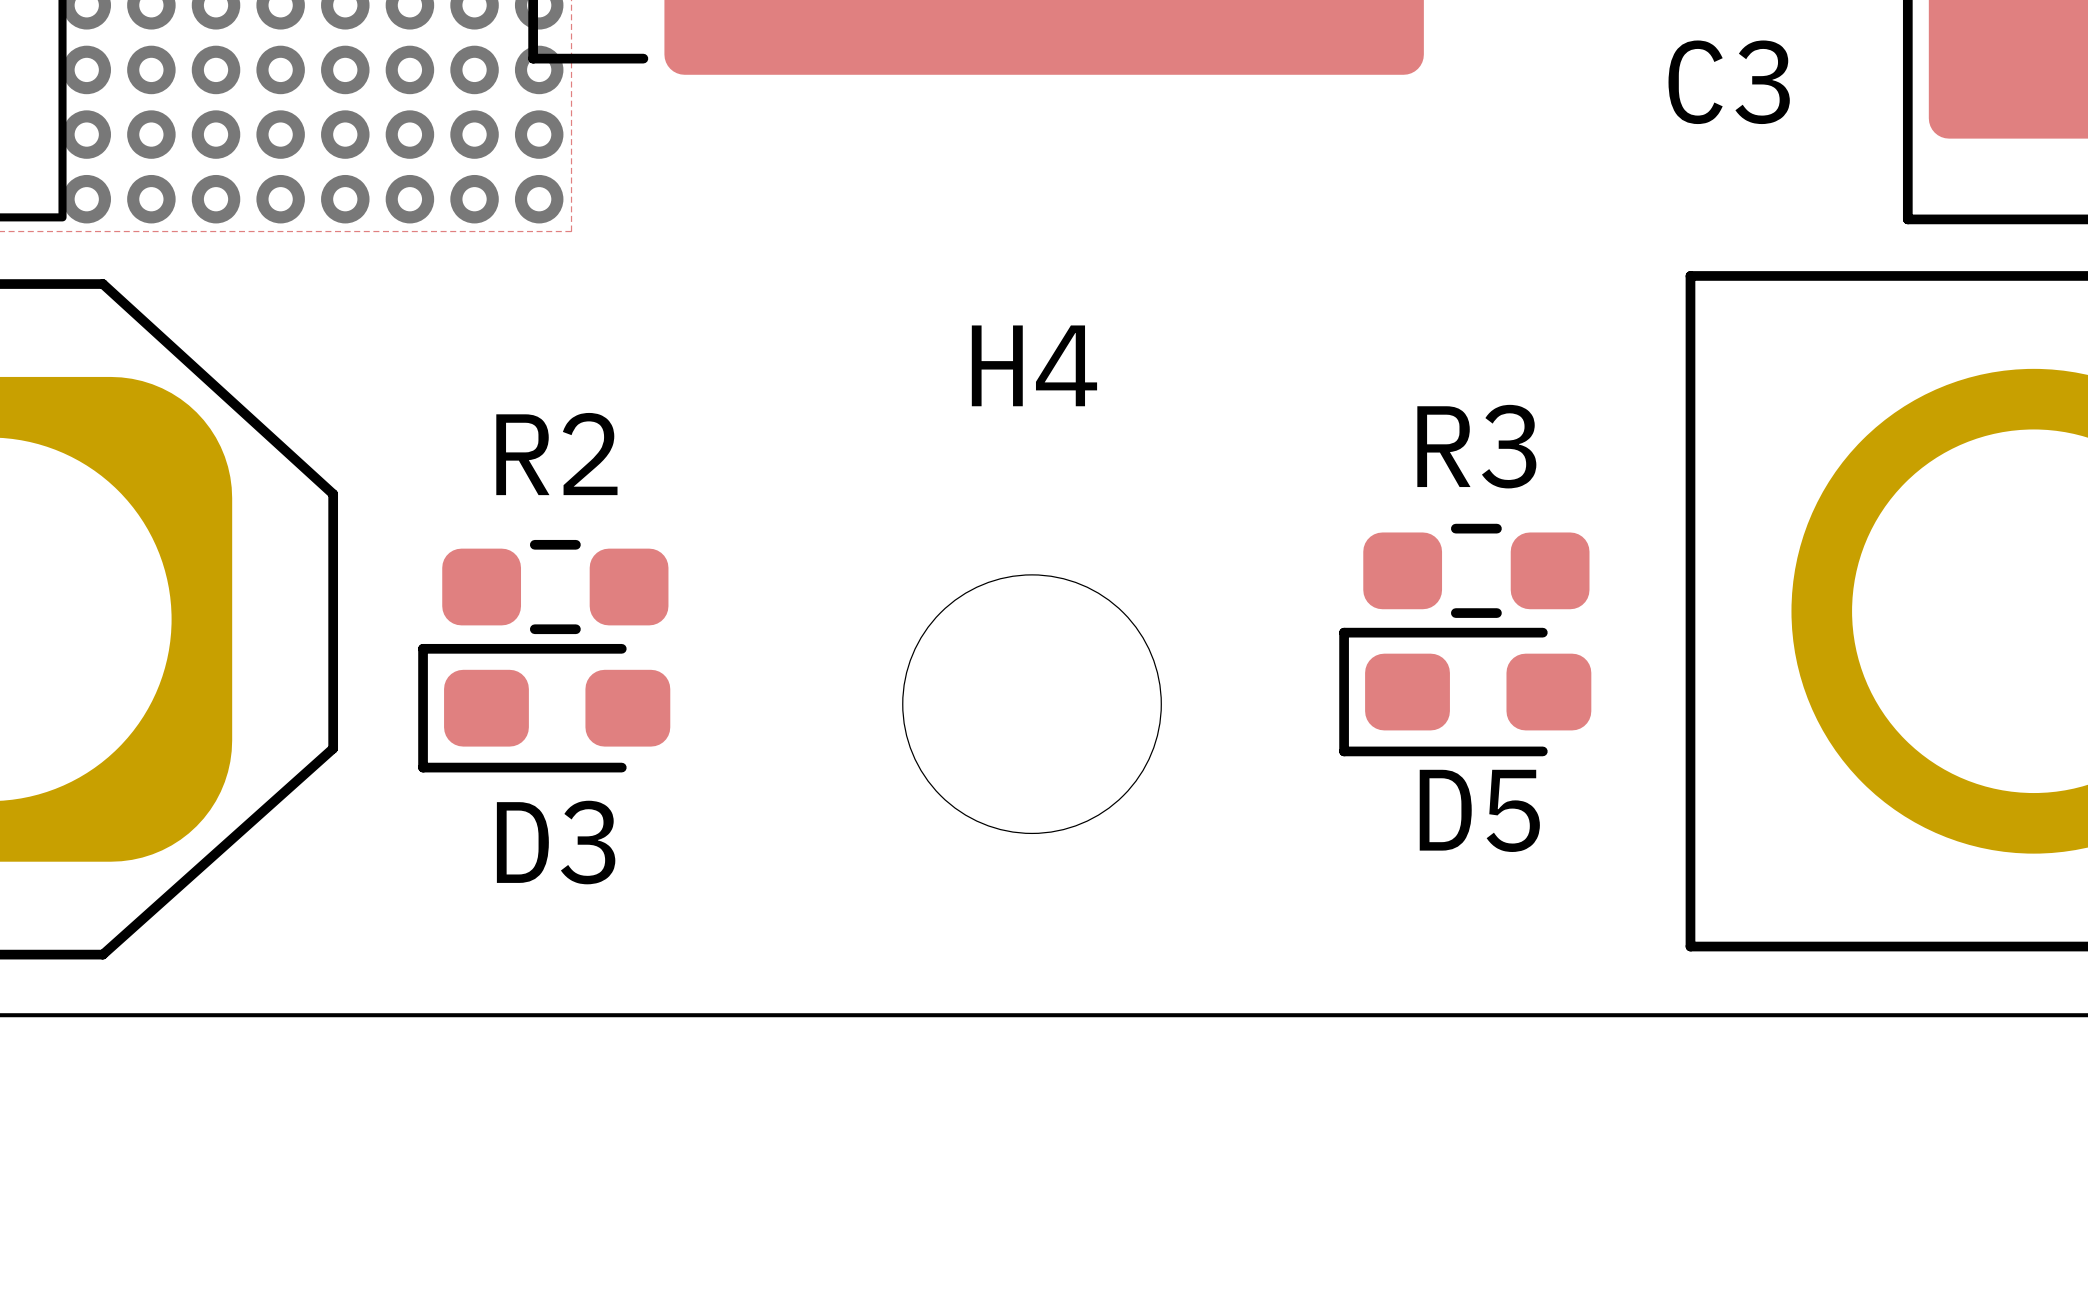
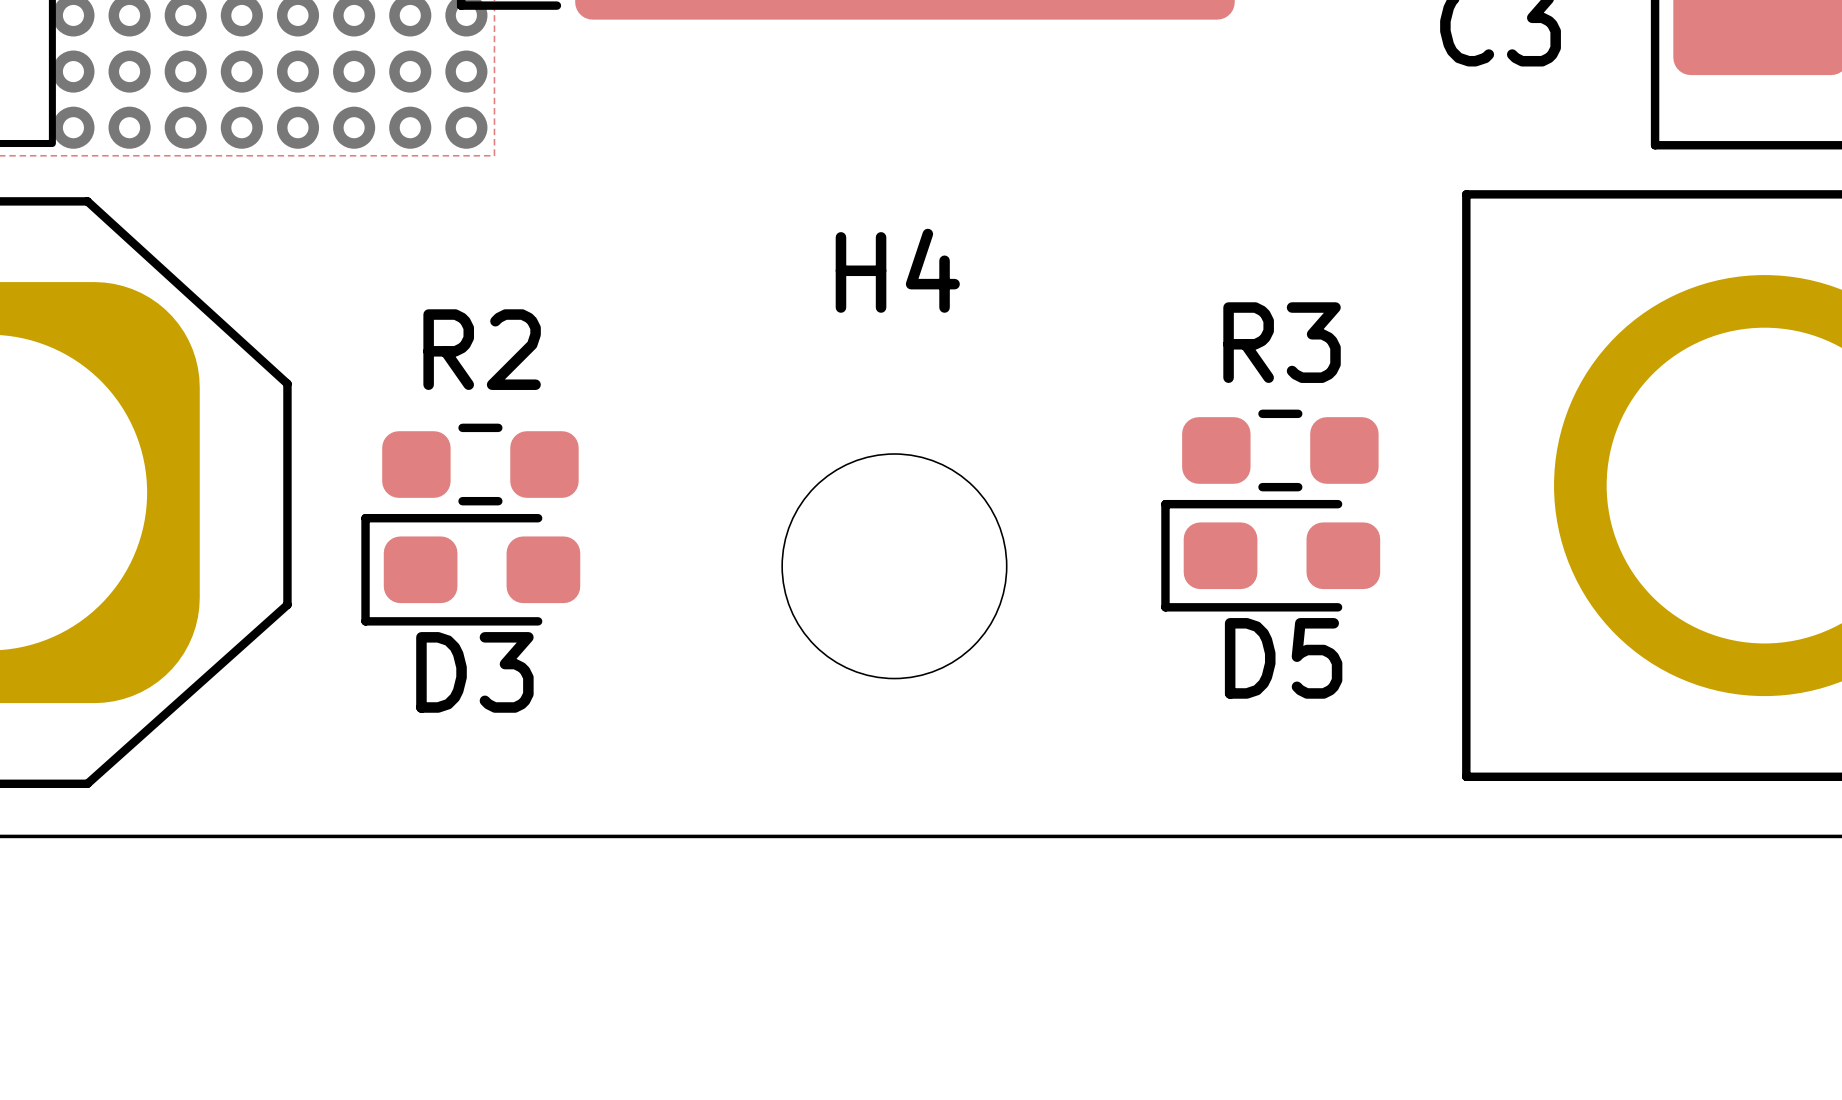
D3 name position: D3 (556, 842) -> D3 (474, 672)

